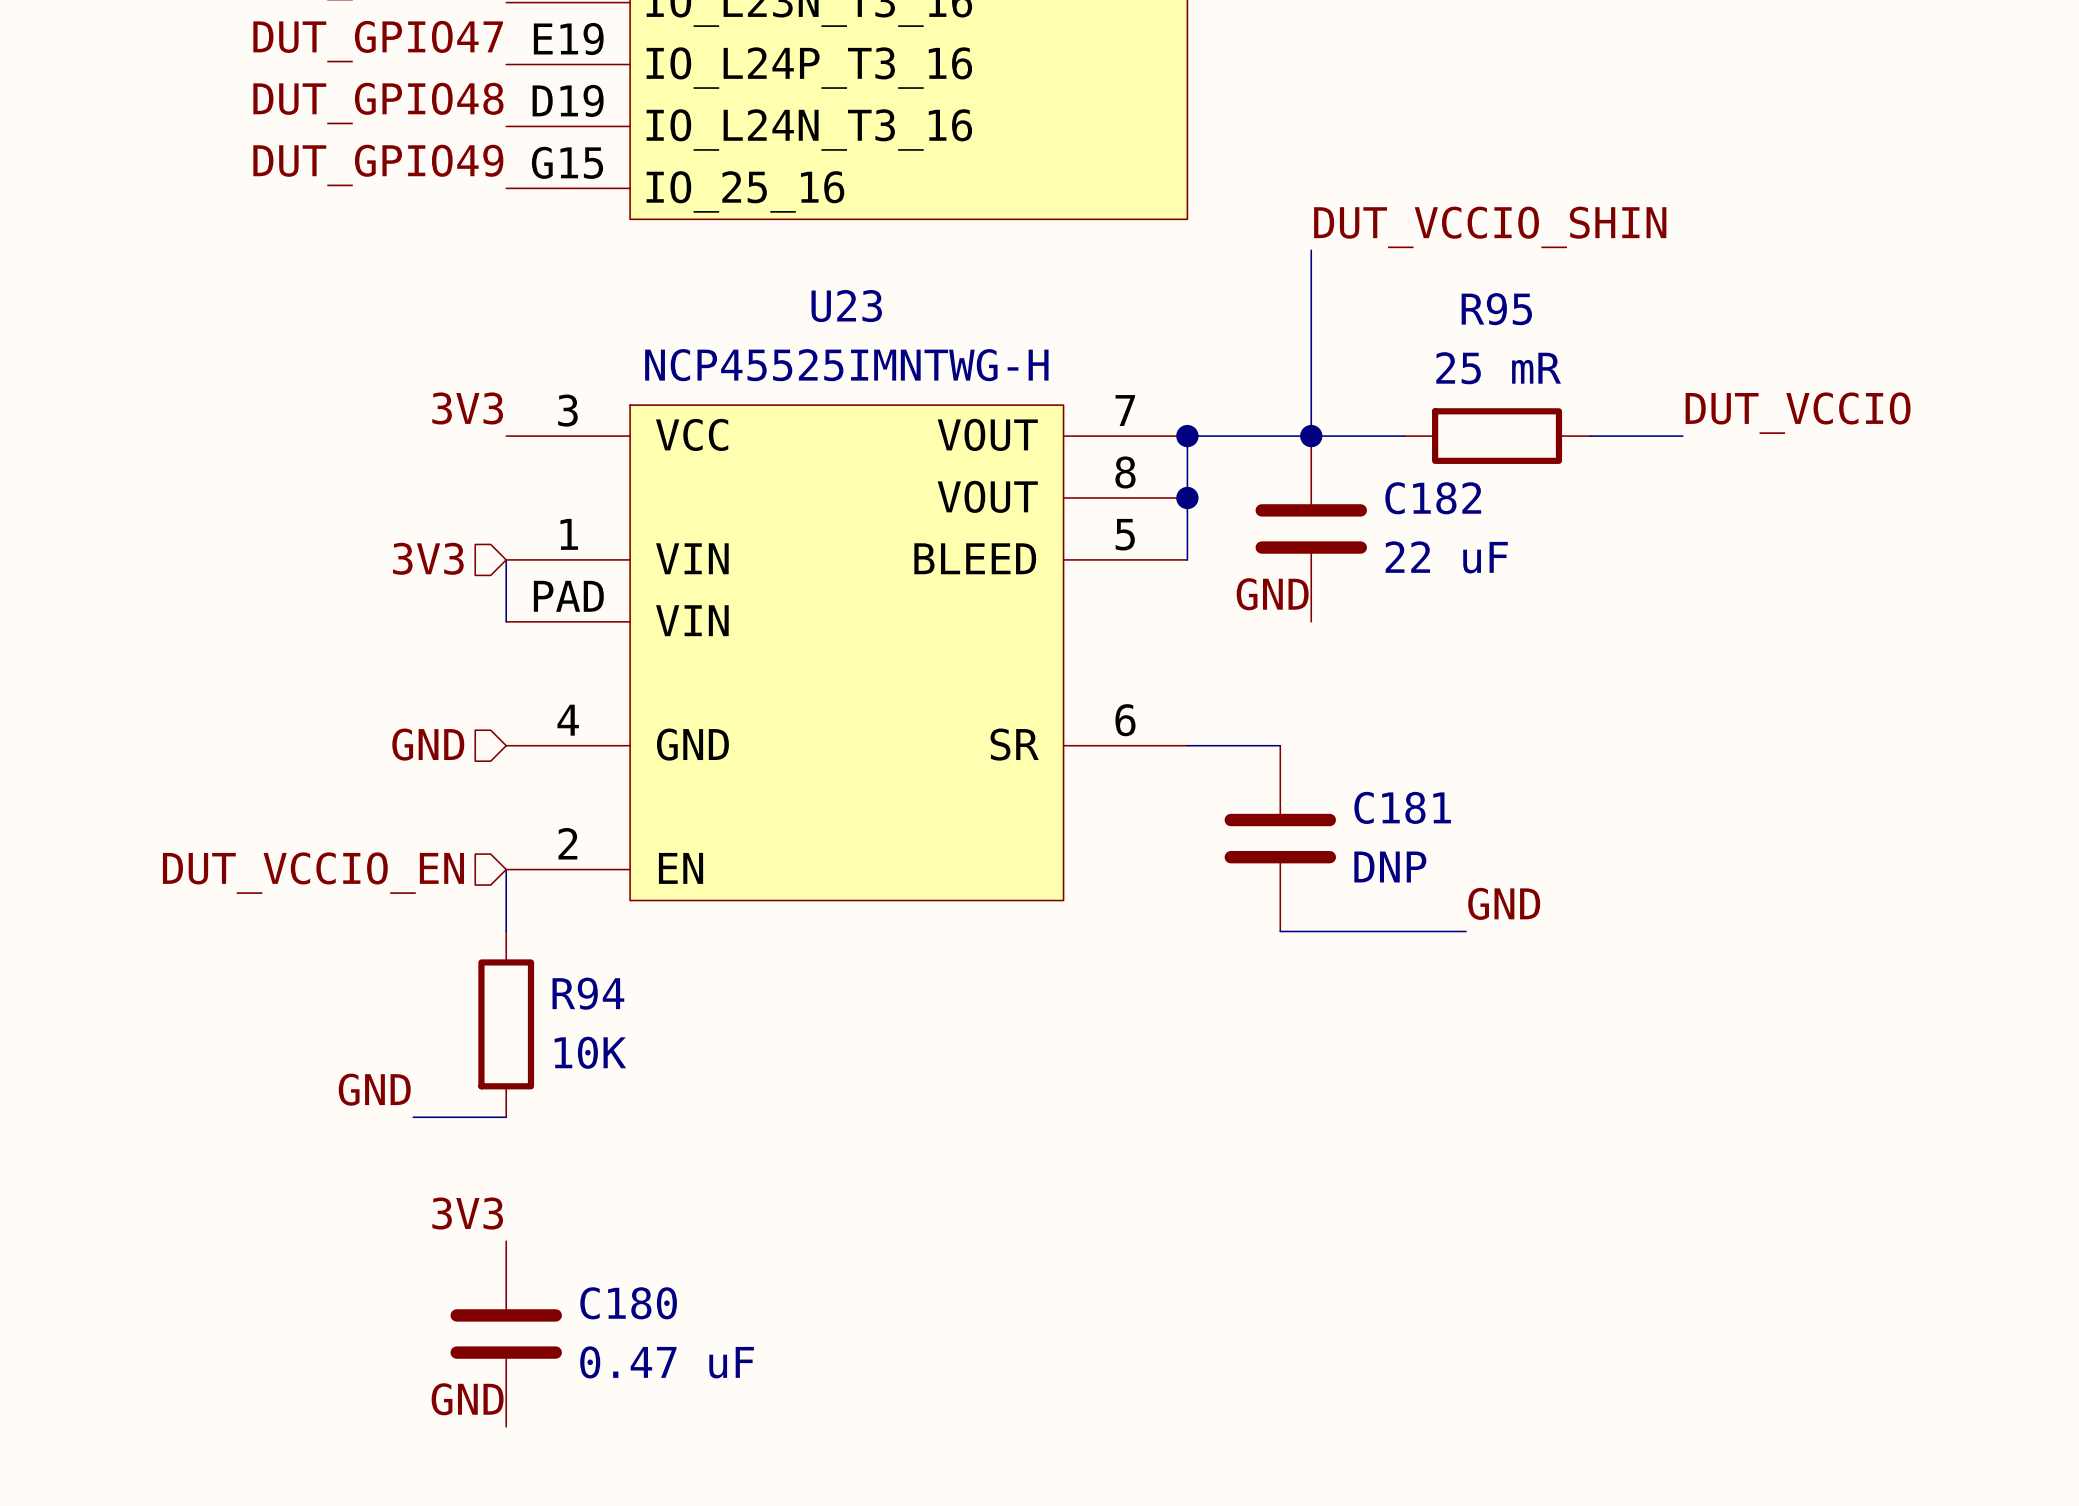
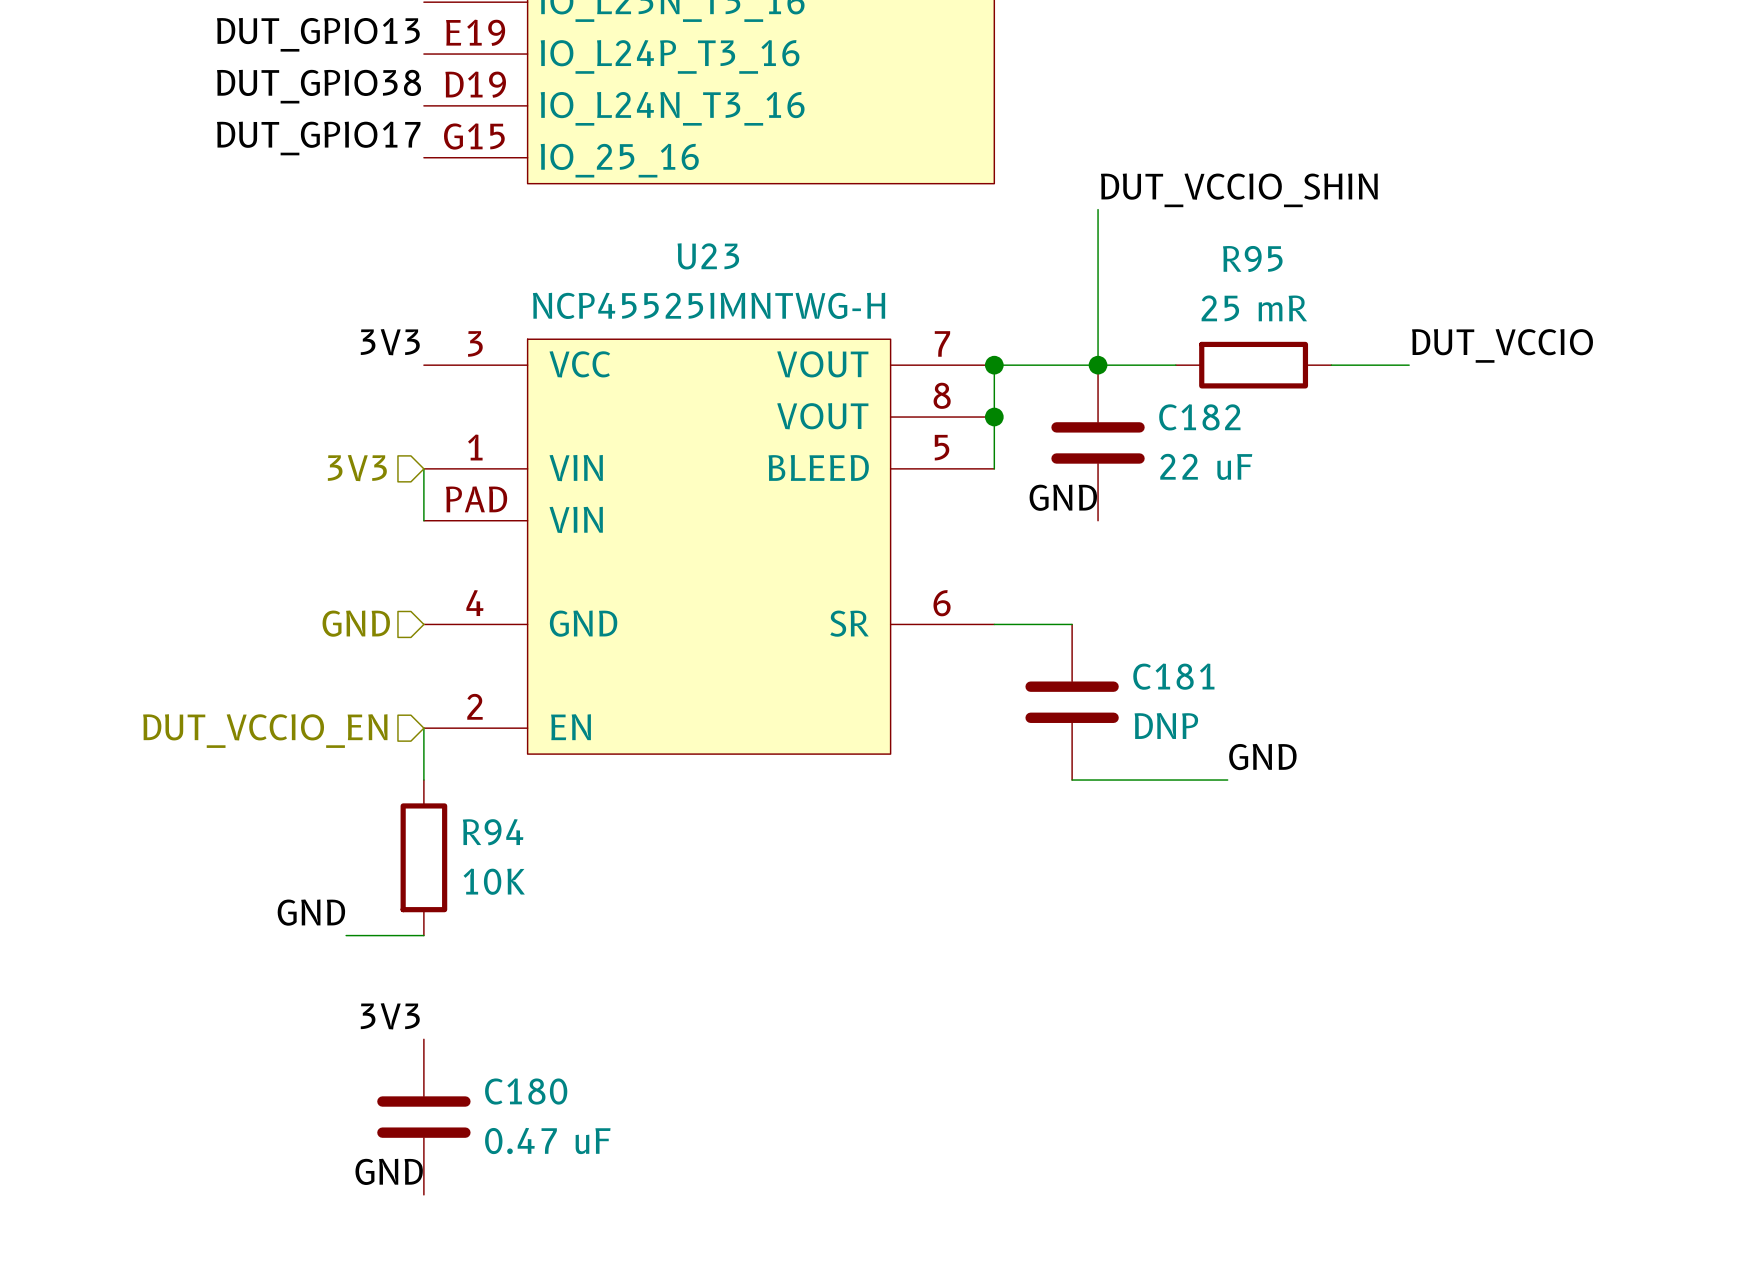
label: DUT_GPIO47 (378, 41) -> DUT_GPIO13 (318, 34)
label: DUT_GPIO48 (378, 103) -> DUT_GPIO38 (319, 86)
label: DUT_GPIO49 (378, 165) -> DUT_GPIO17 (318, 138)

